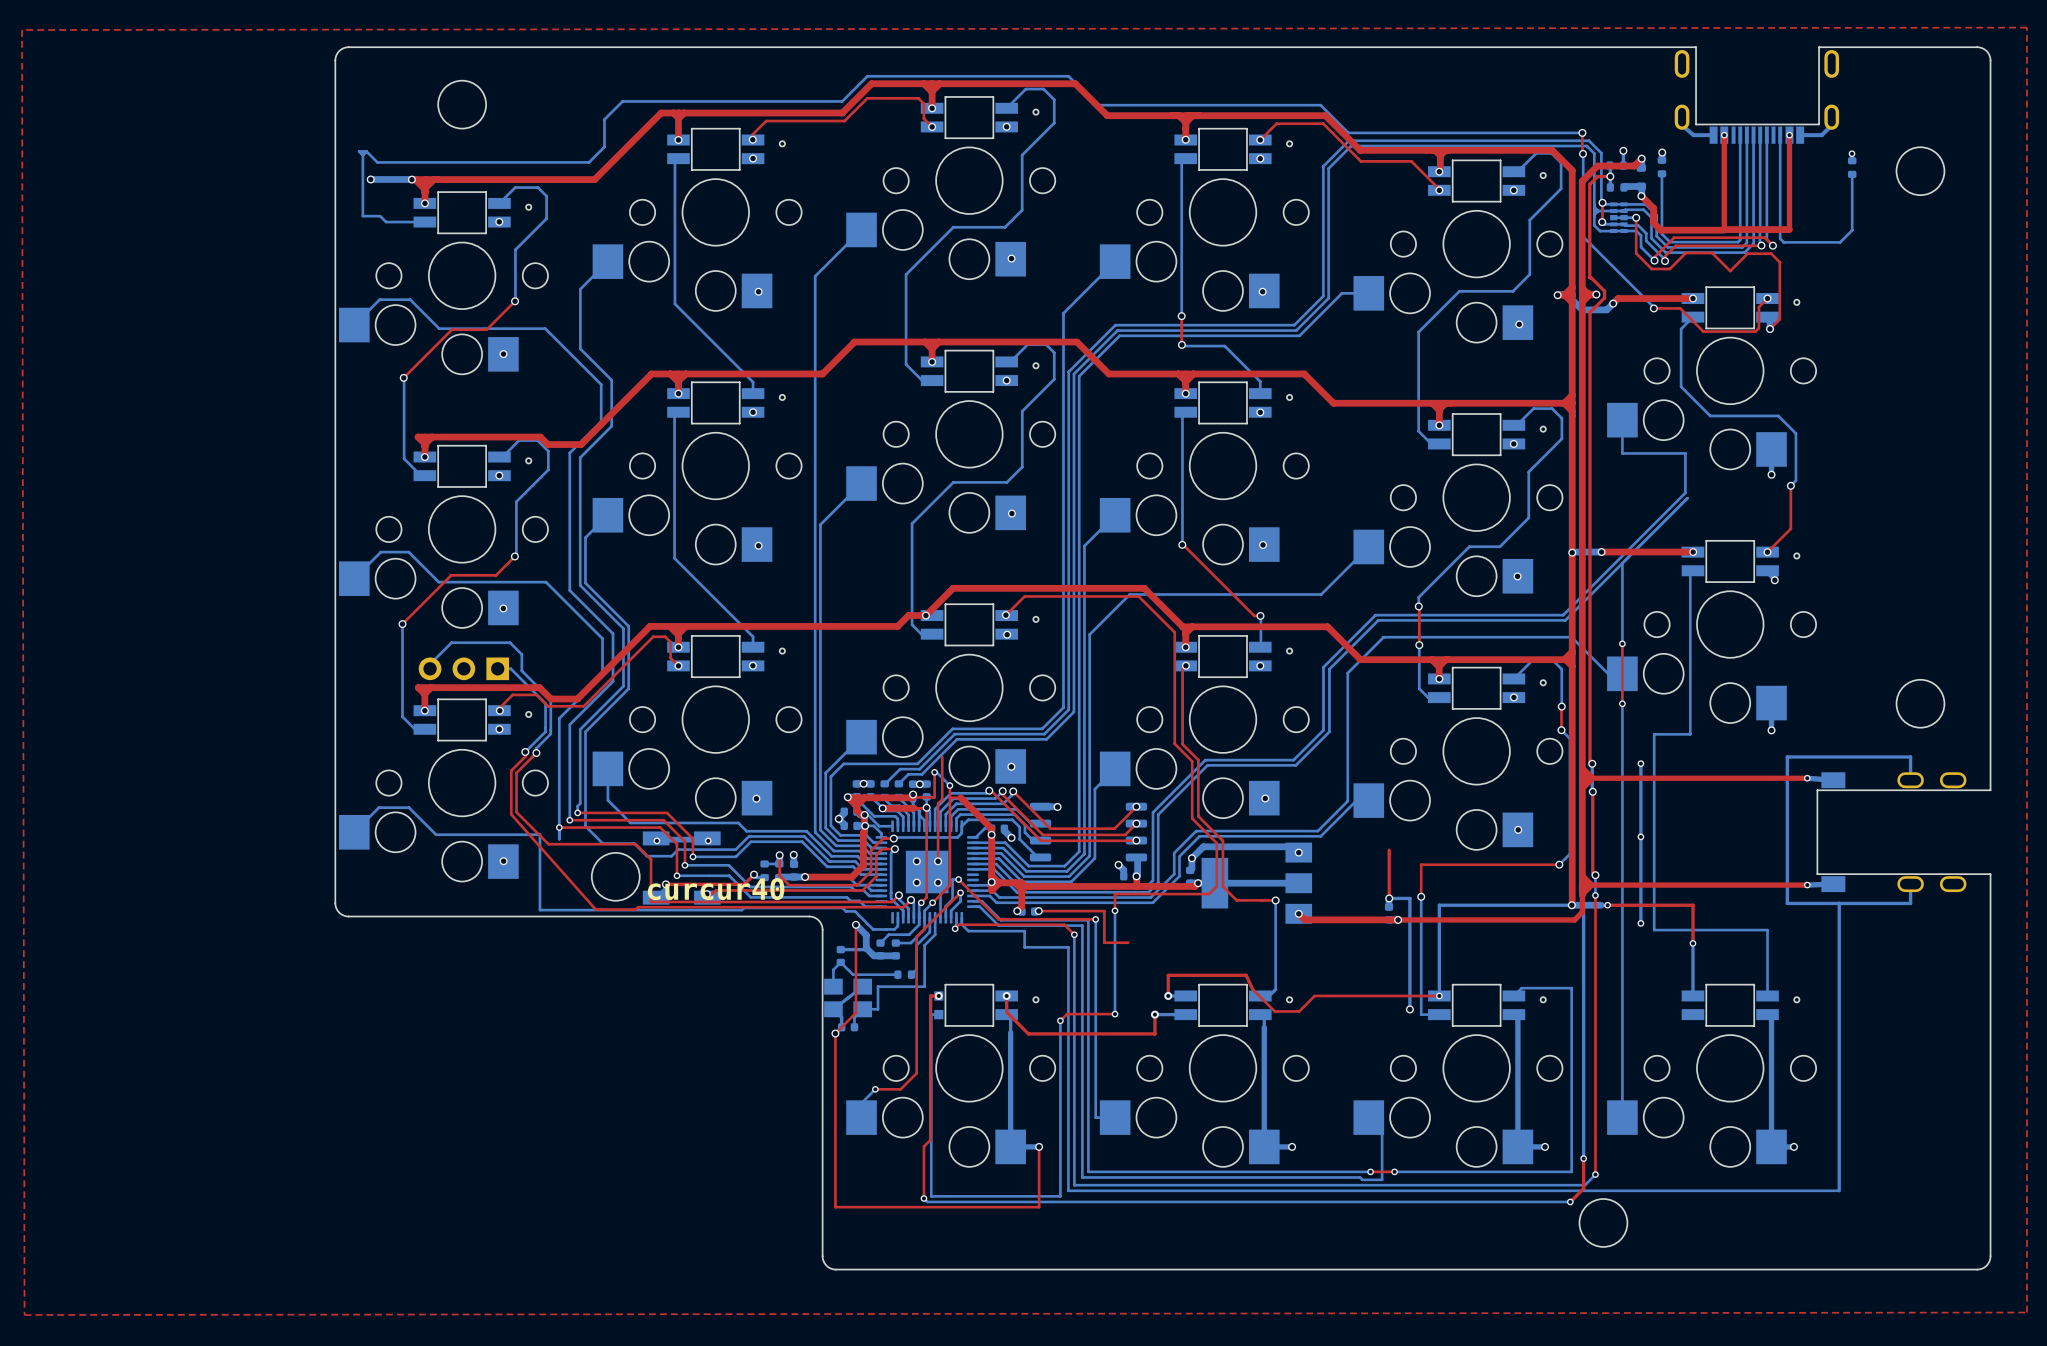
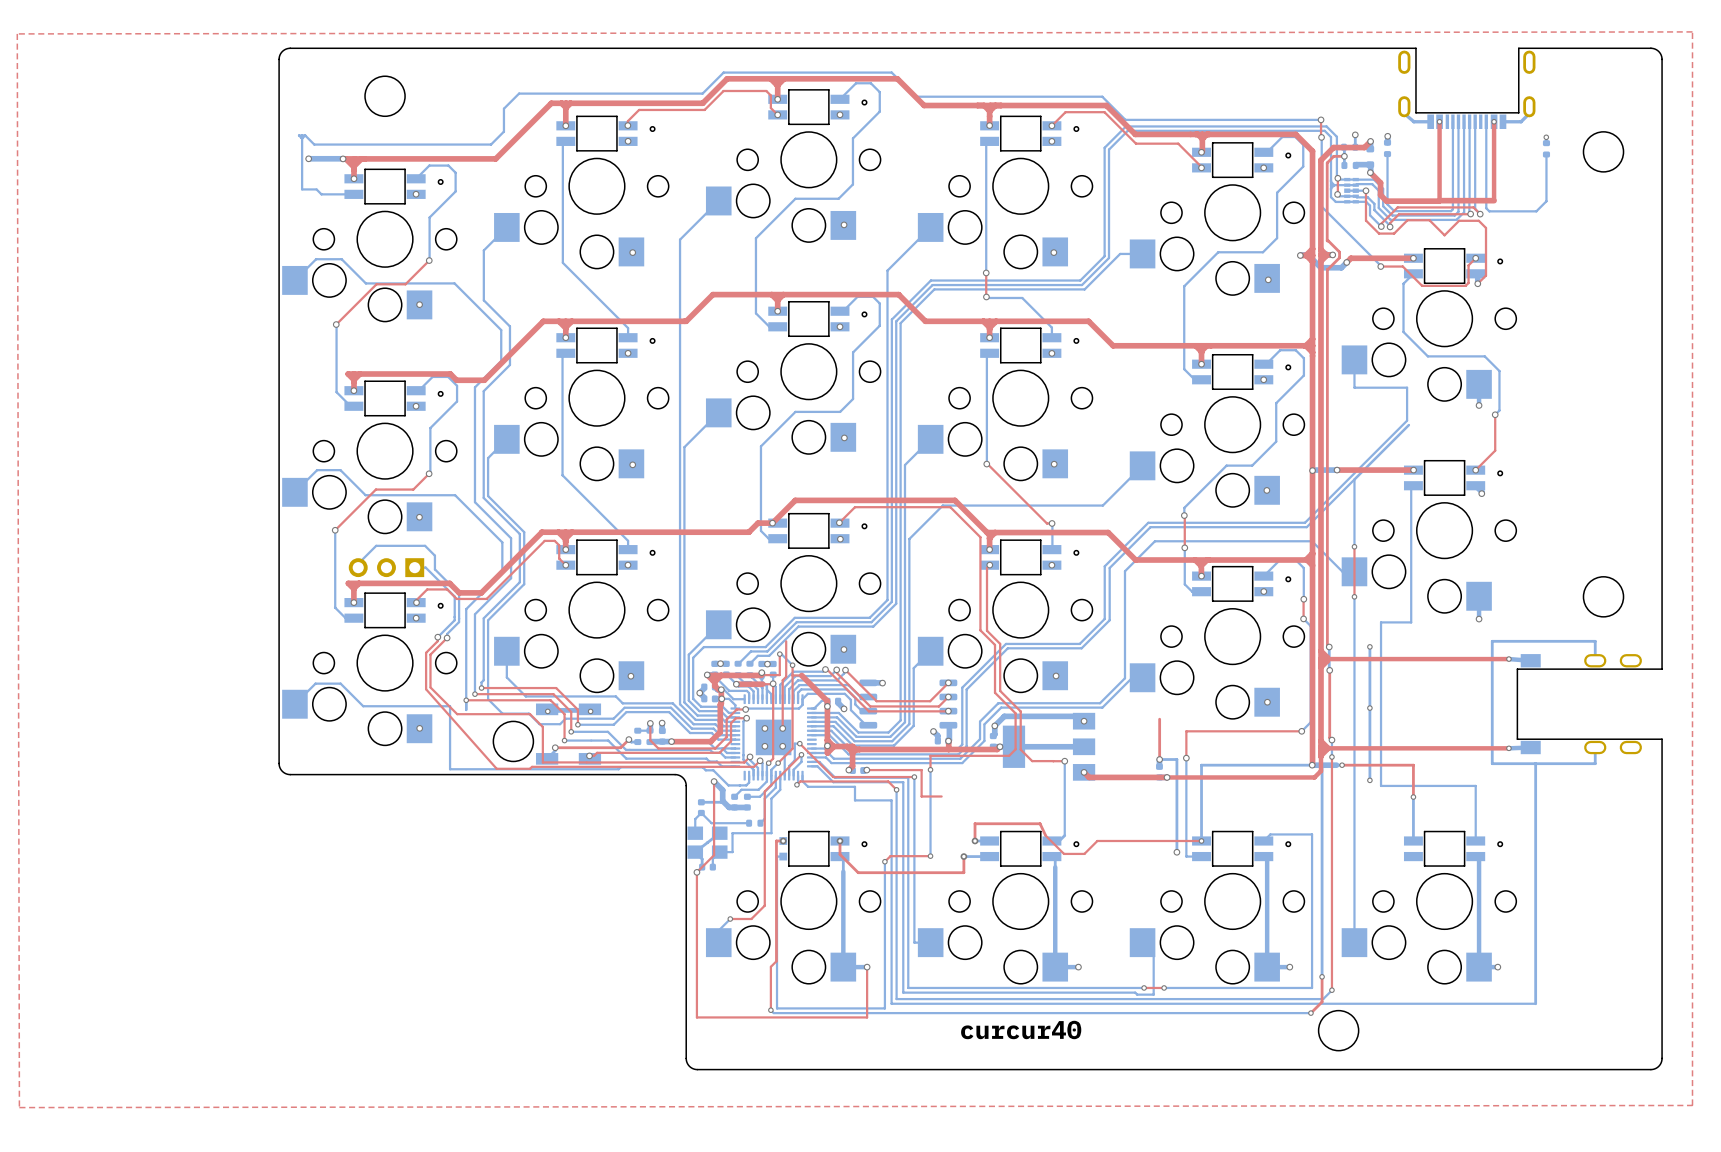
text: curcur40 (716, 889) -> none
text: none -> curcur40 (1021, 1029)

